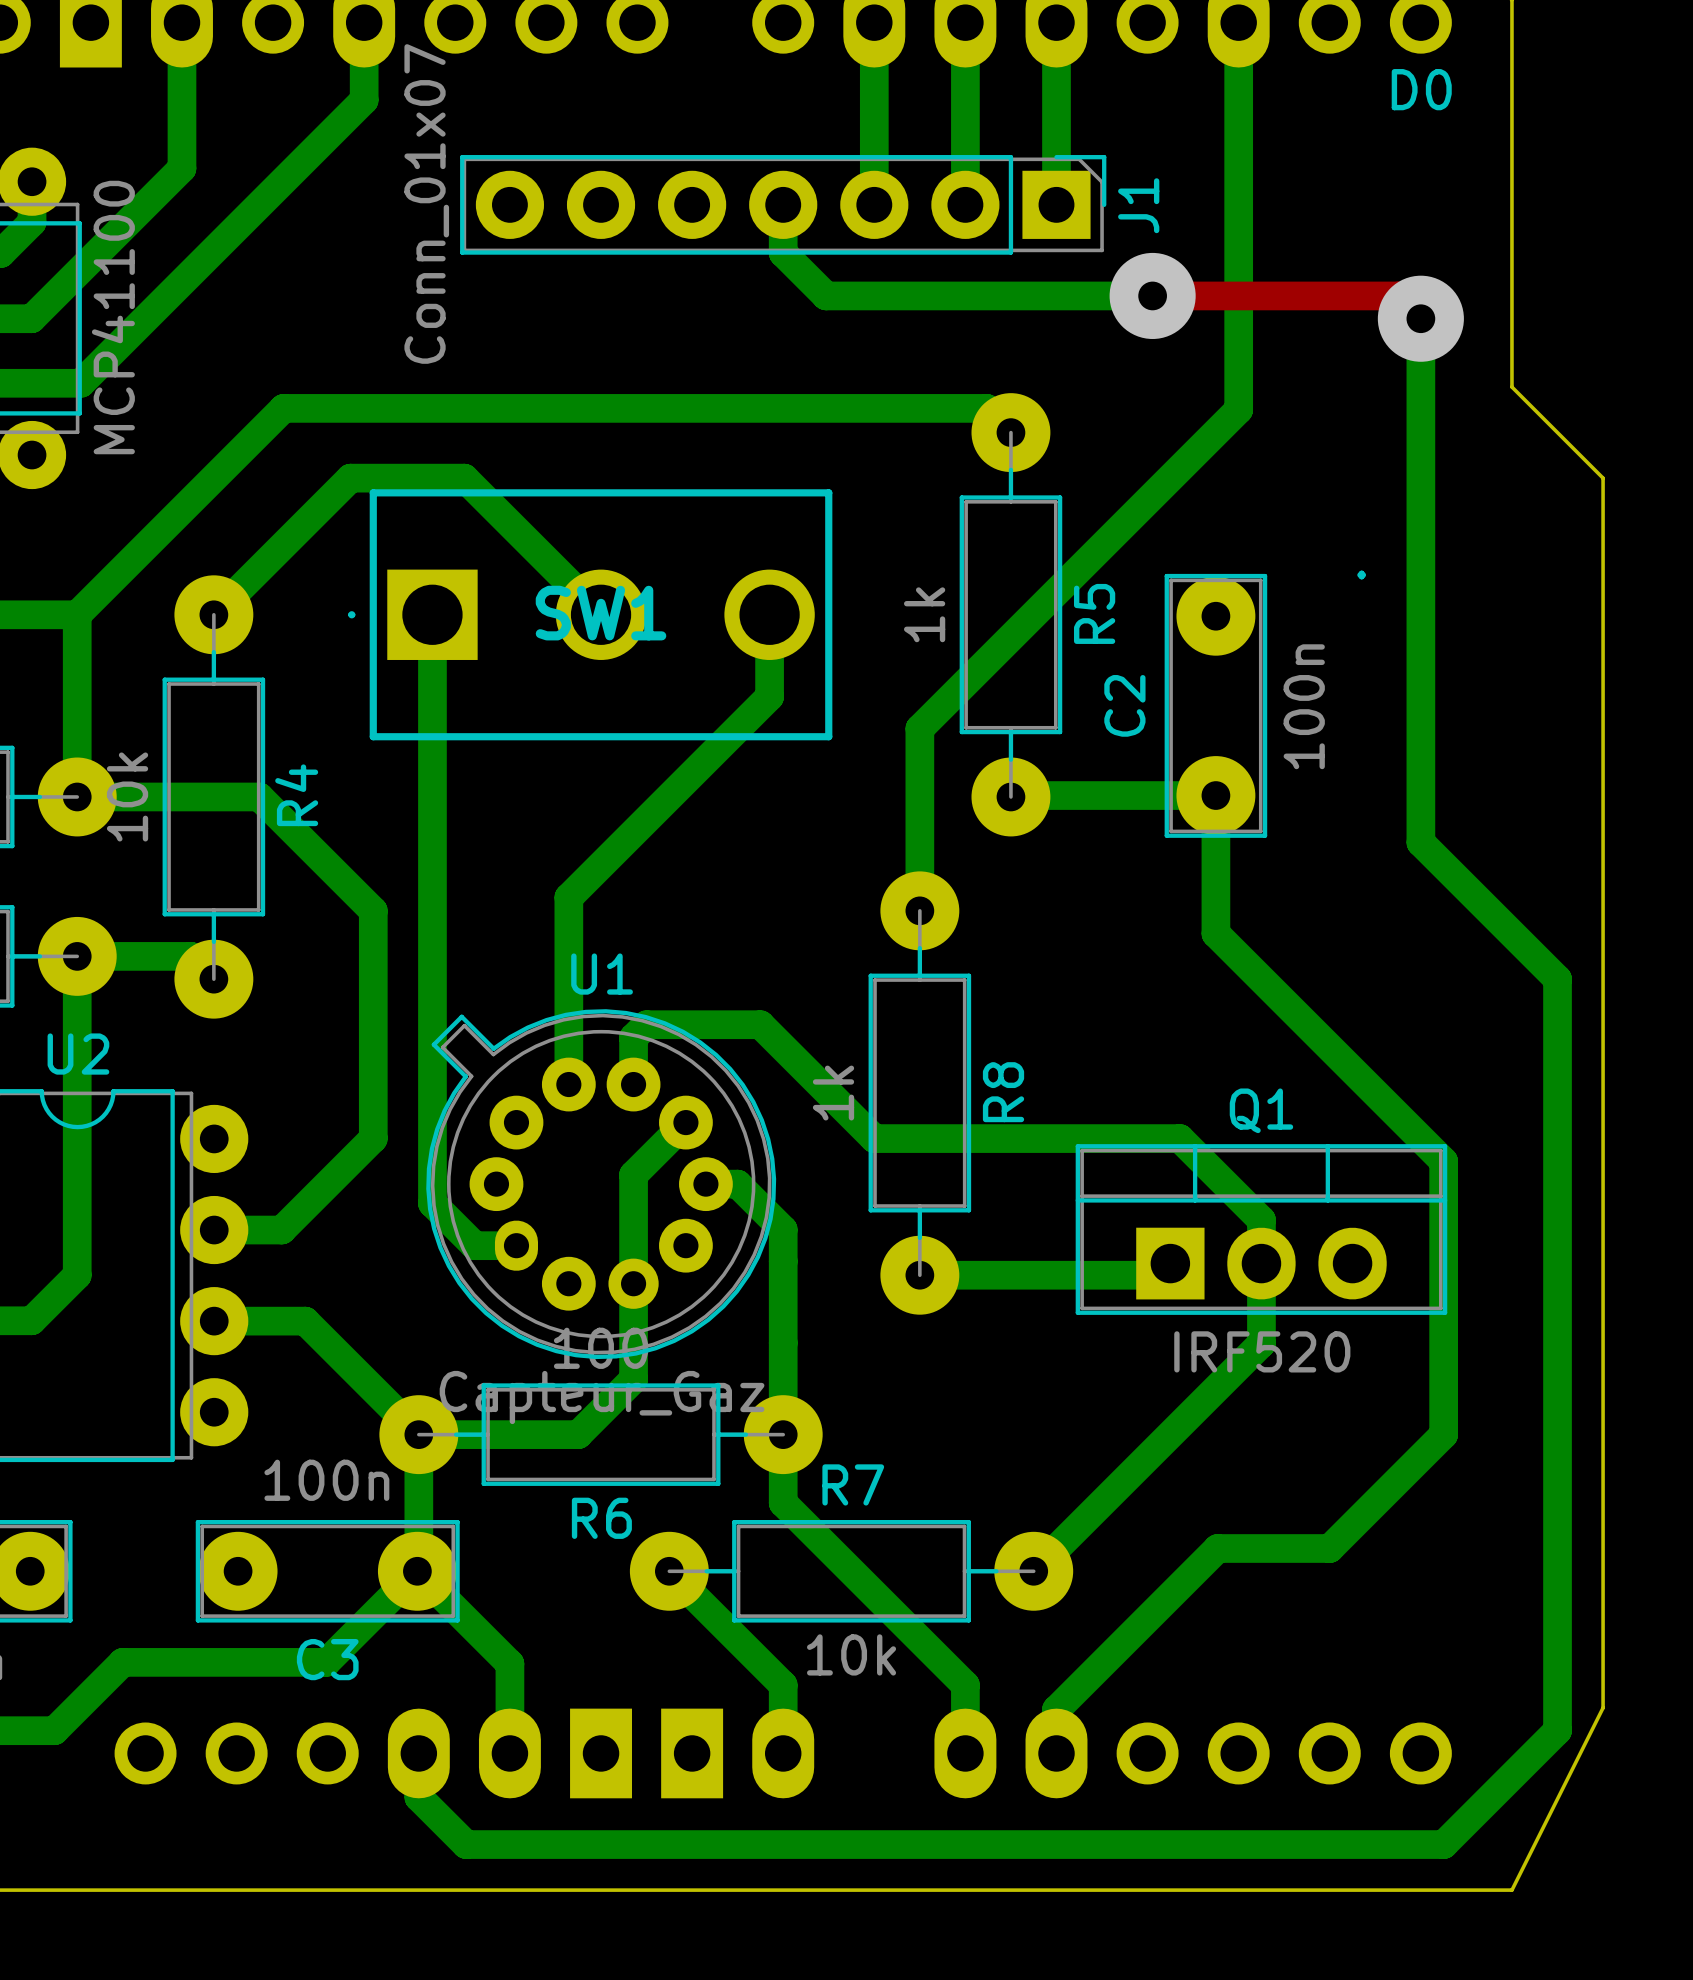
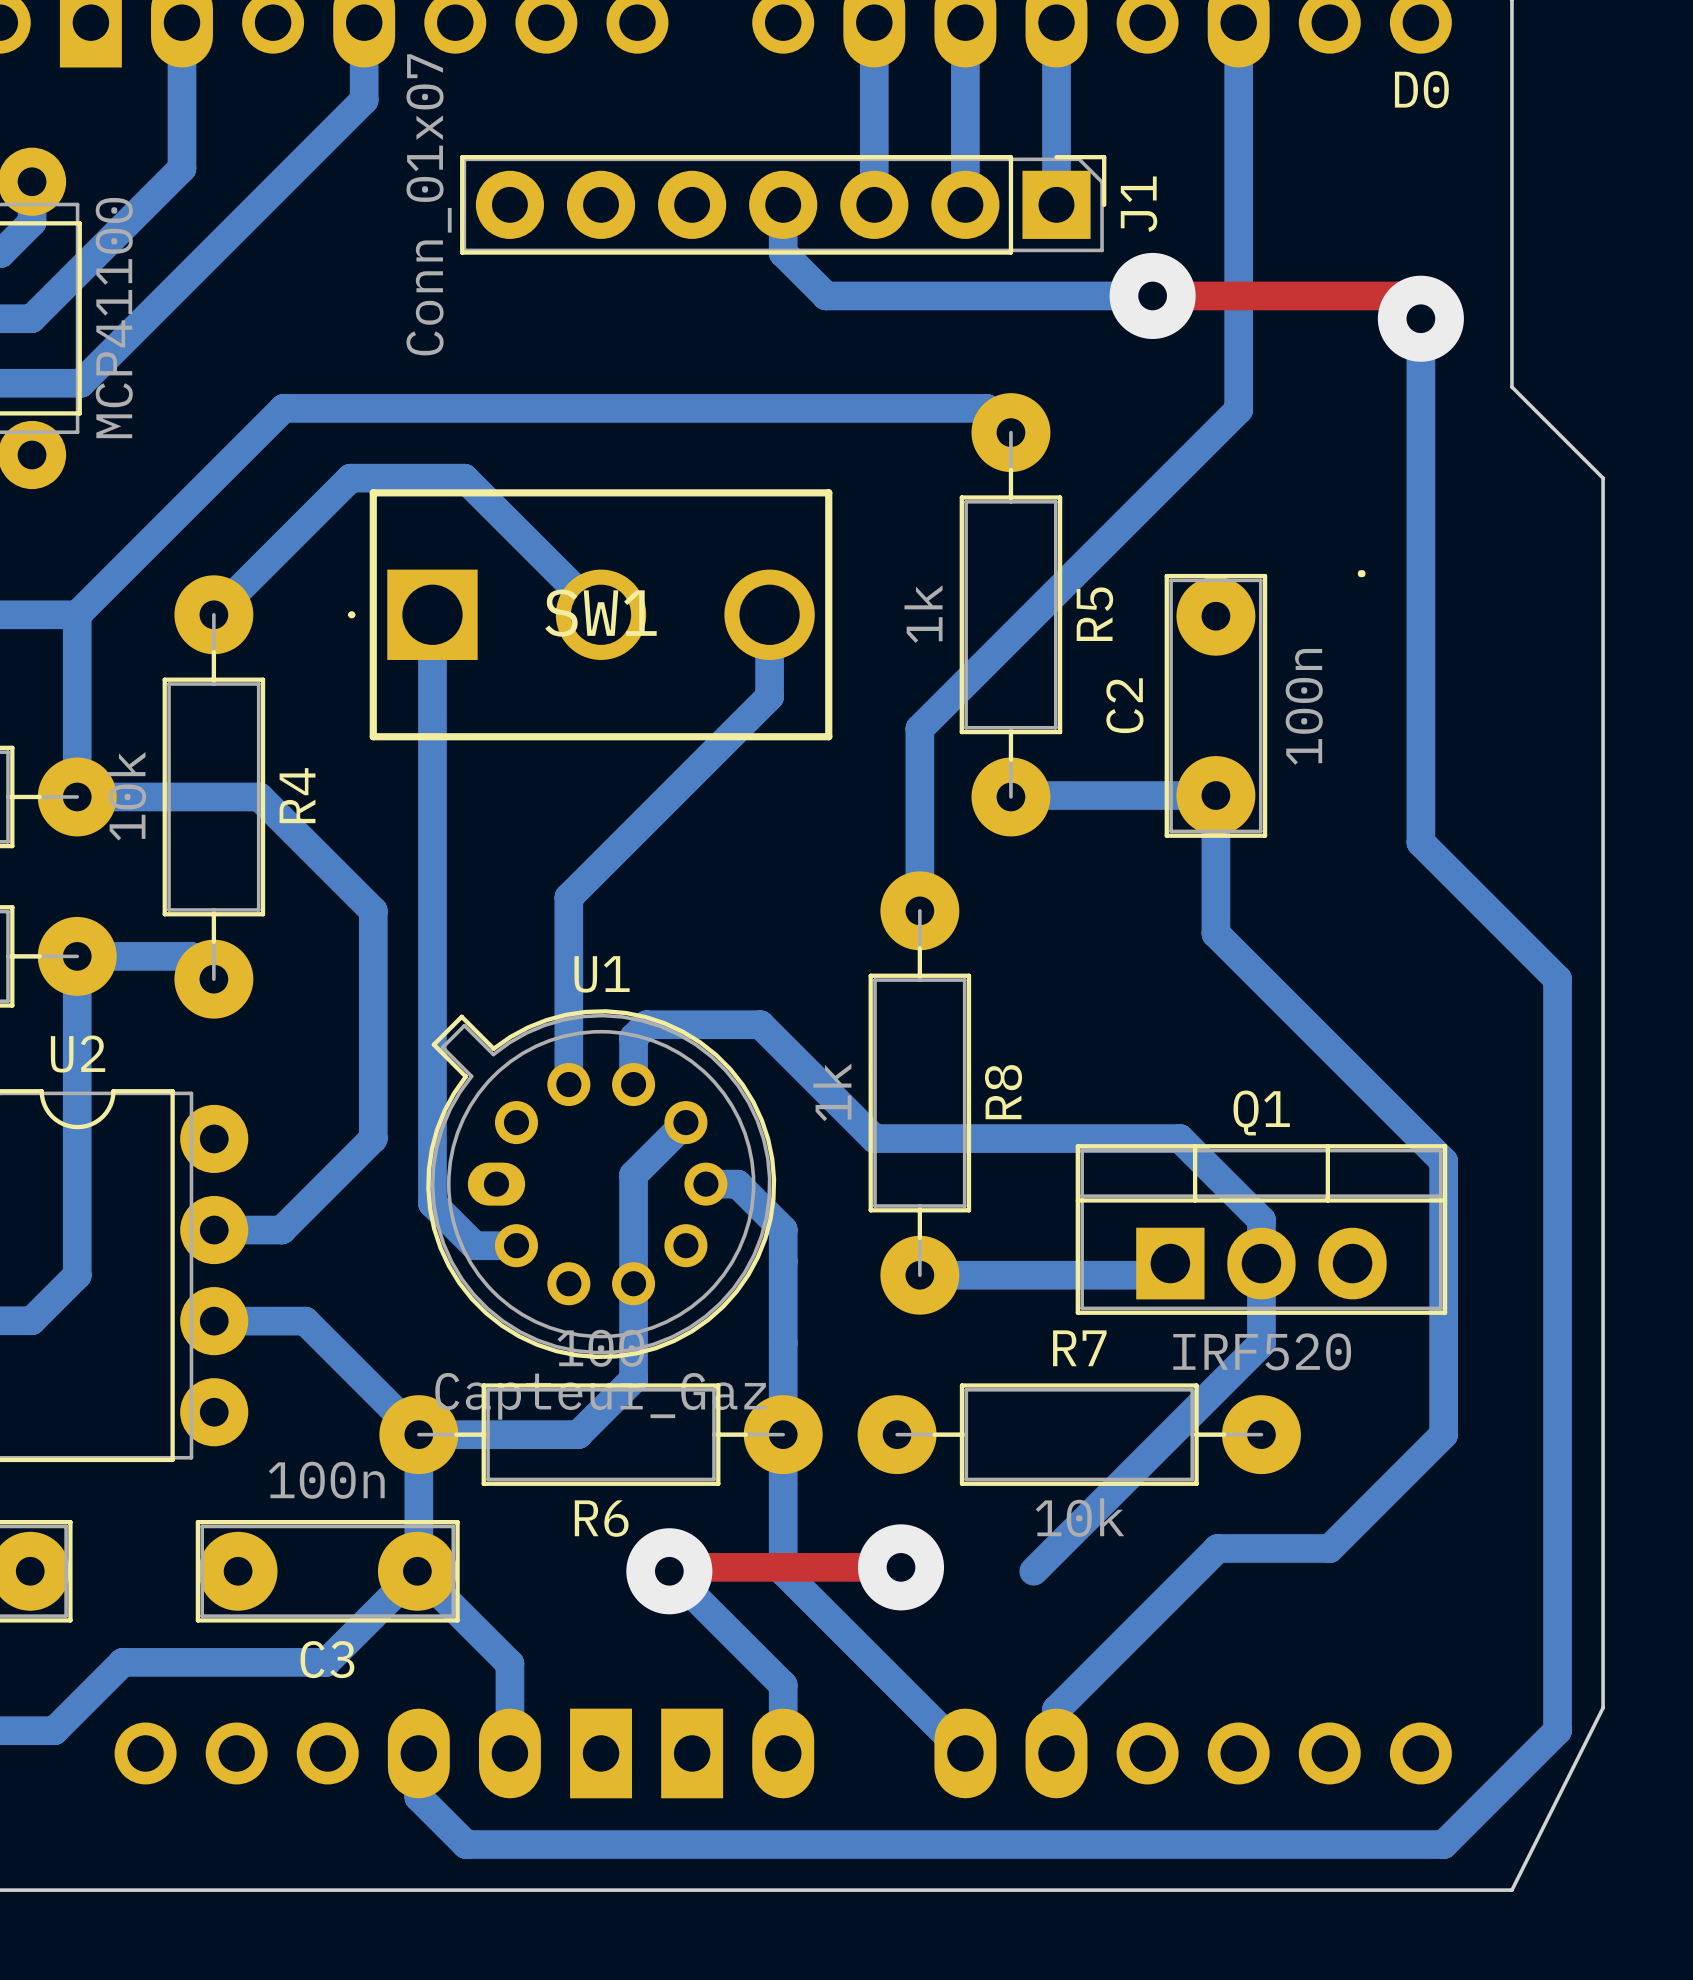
U1 footprint: [426, 1009, 777, 1360] -> [426, 1009, 777, 1360]
bottom track: (783, 1502) (965, 1685) (965, 1753) -> (783, 1502) (783, 1571) (965, 1753)
top track: none -> (901, 1567) (673, 1567) (669, 1571)
via: none -> (901, 1567)
via: none -> (669, 1571)
R7 position: (851, 1571) -> (1079, 1434)

